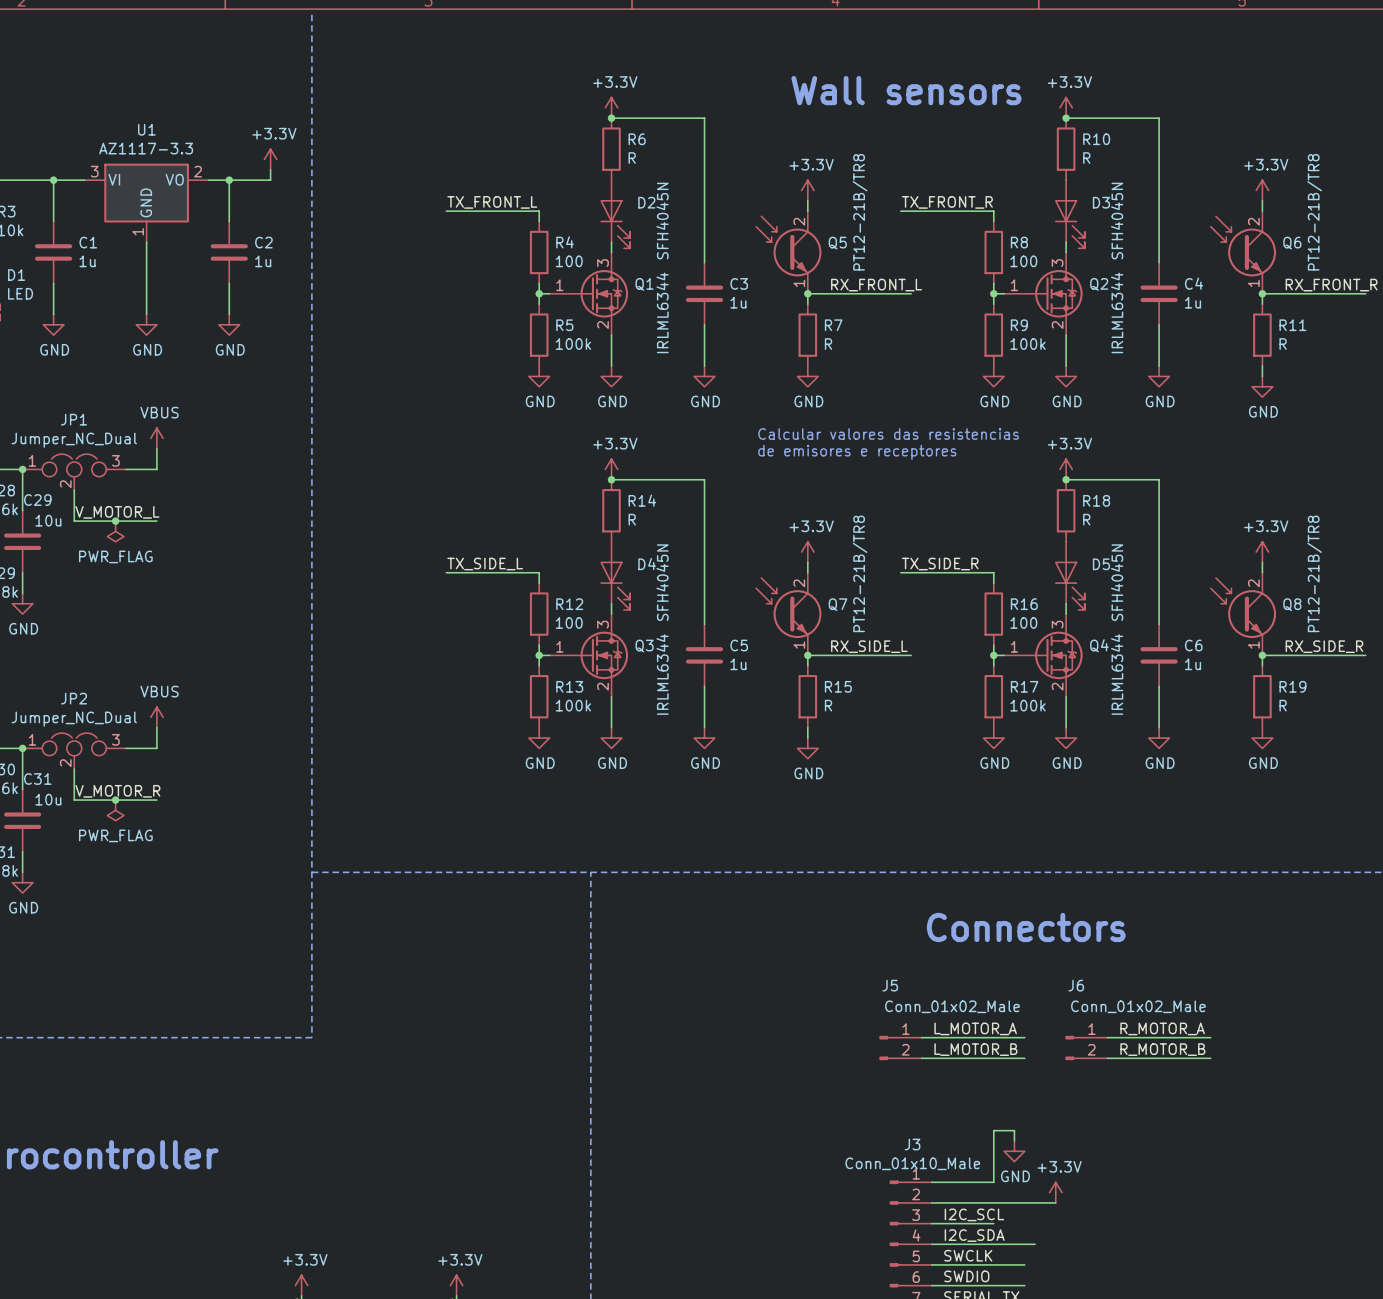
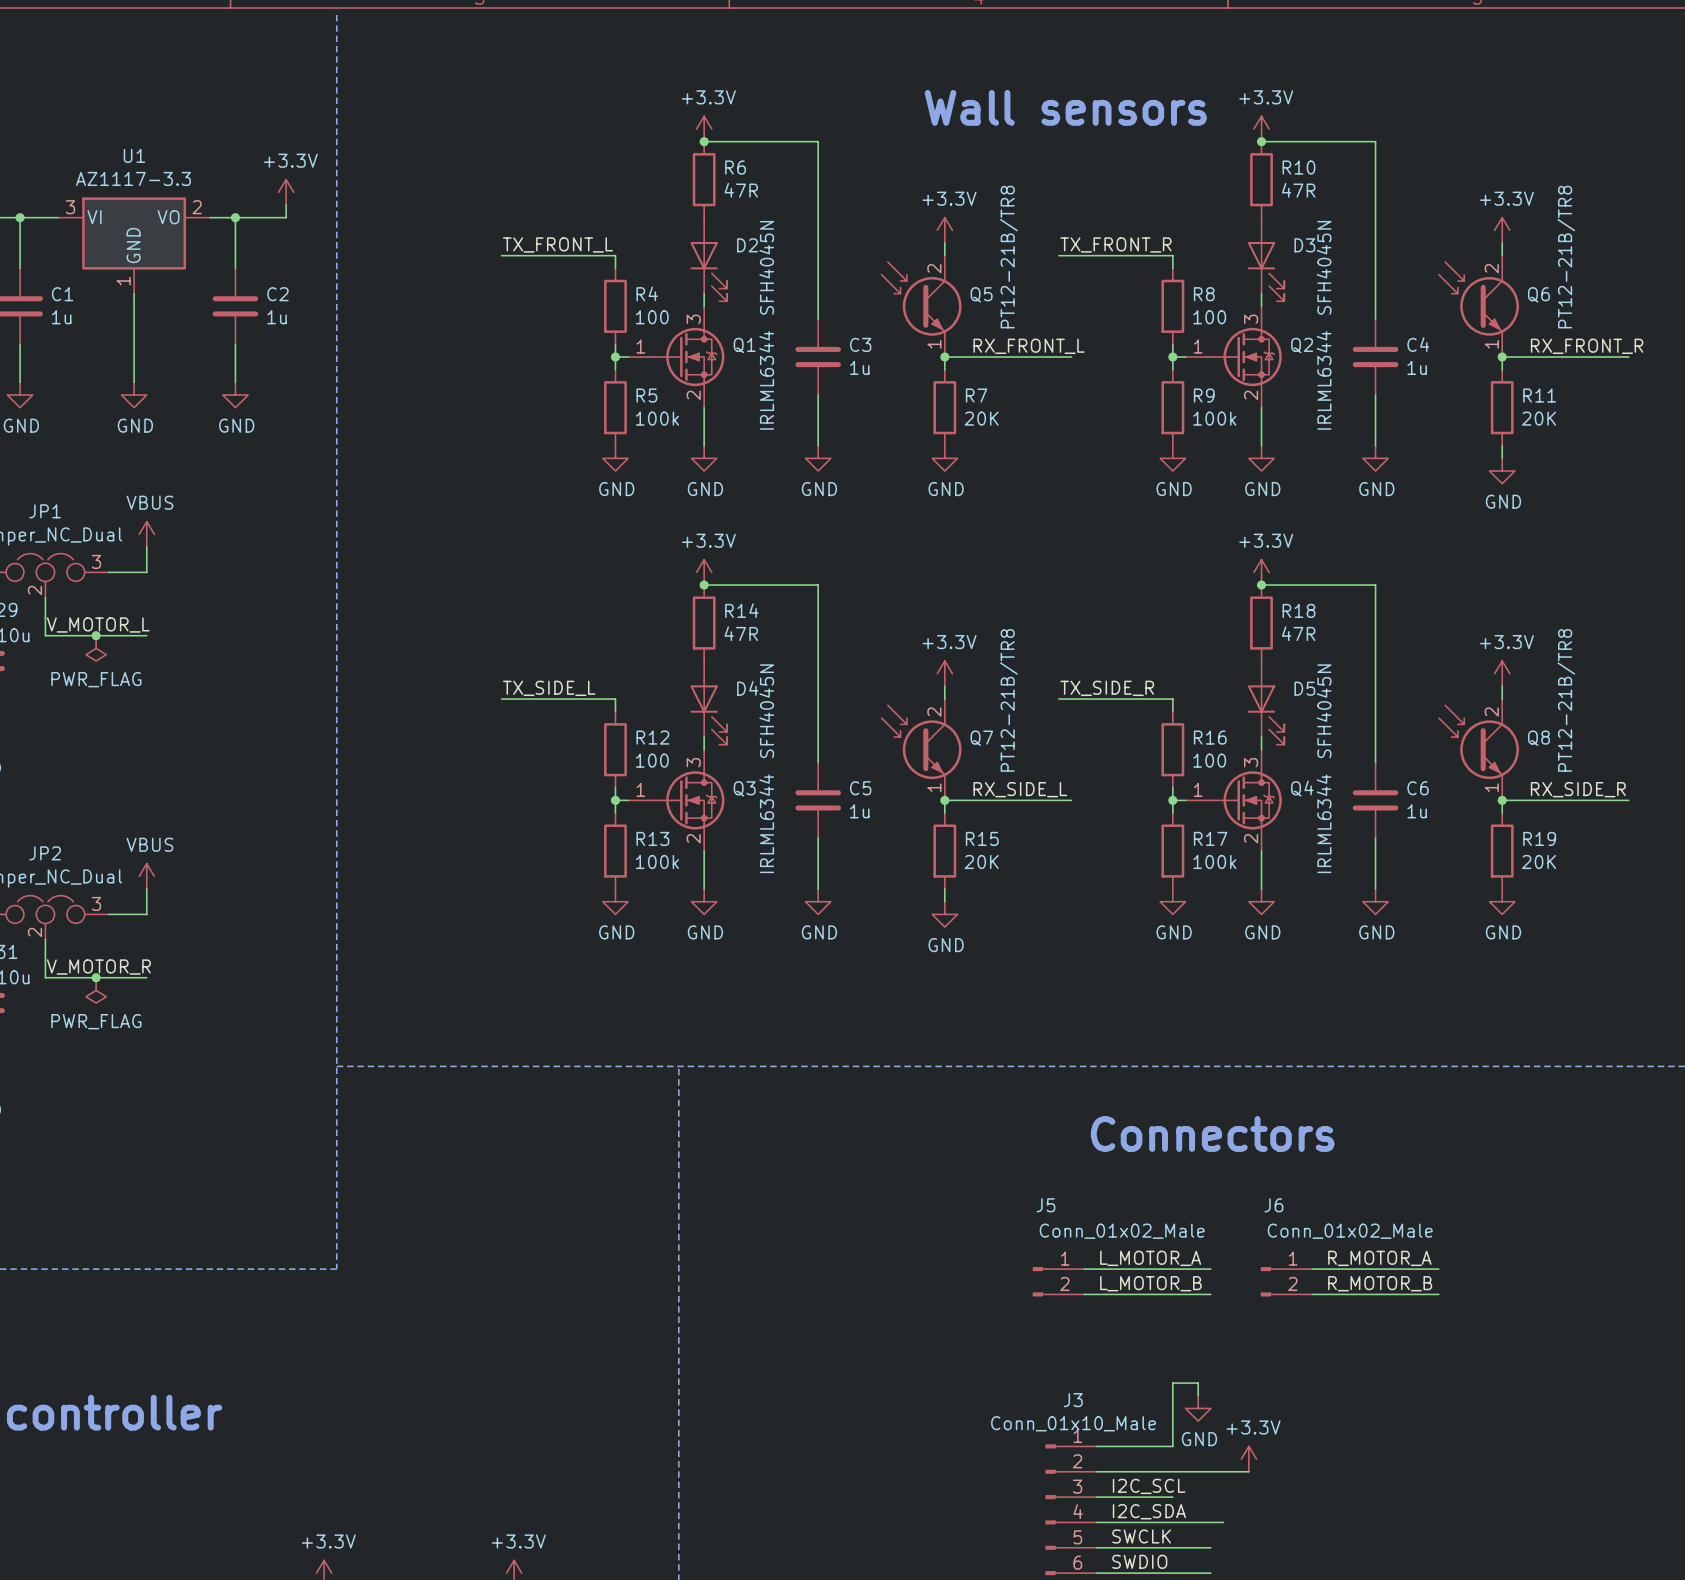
R6 value: R (632, 158) -> 47R (741, 190)
R10 value: R (1086, 158) -> 47R (1298, 190)
R7 value: R (828, 344) -> 20K (981, 418)
R11 value: R (1283, 344) -> 20K (1539, 418)
text: Calcular valores das resistencias (888, 434) -> none
text: de emisores e receptores (857, 452) -> none
R14 value: R (632, 519) -> 47R (741, 633)
R18 value: R (1086, 519) -> 47R (1298, 633)
R15 value: R (828, 705) -> 20K (981, 861)
R19 value: R (1283, 705) -> 20K (1539, 861)

